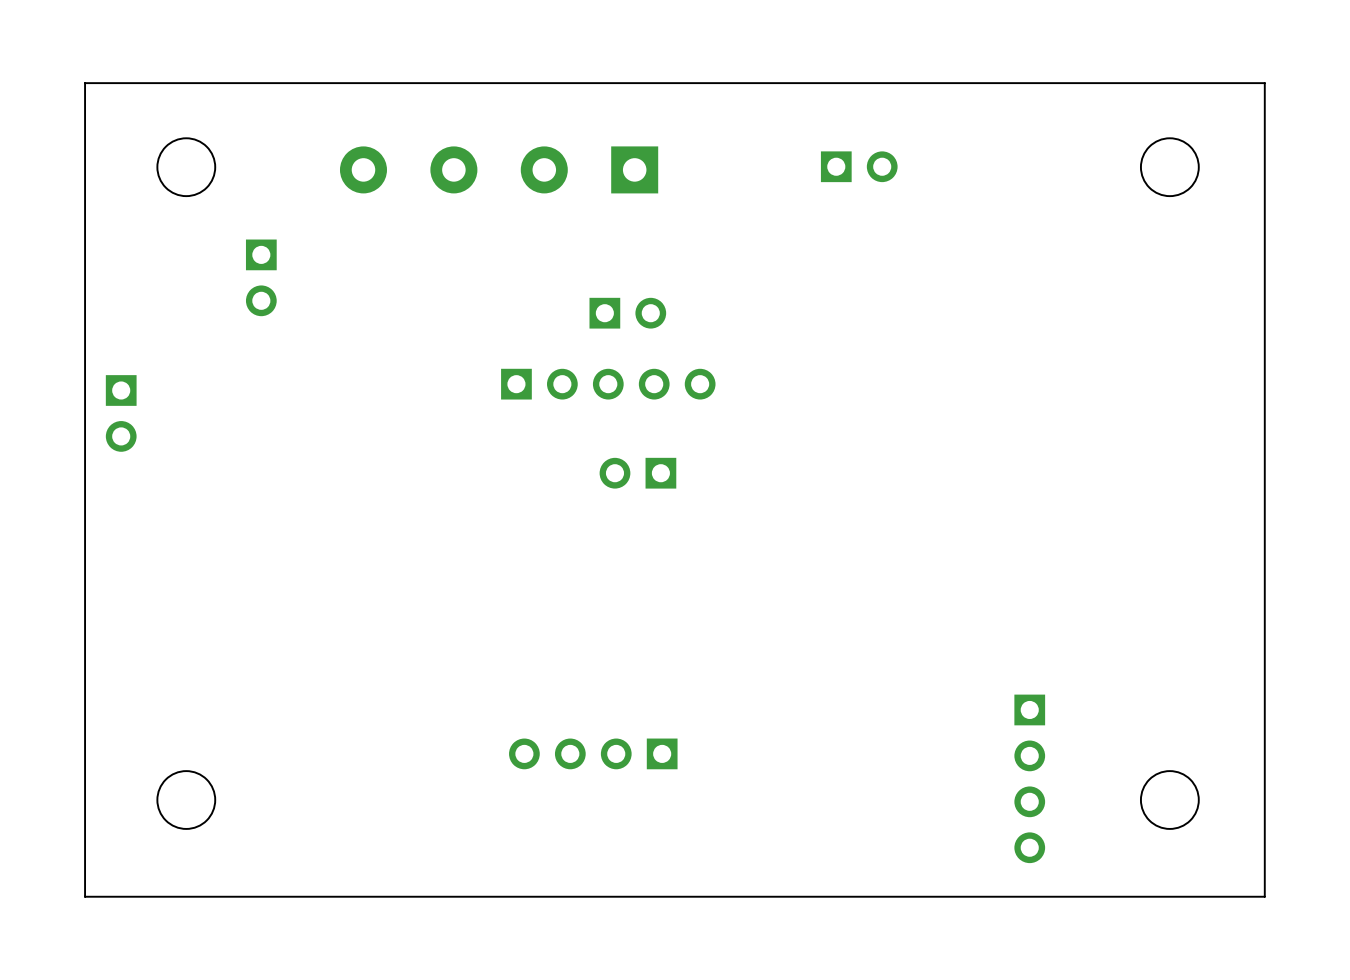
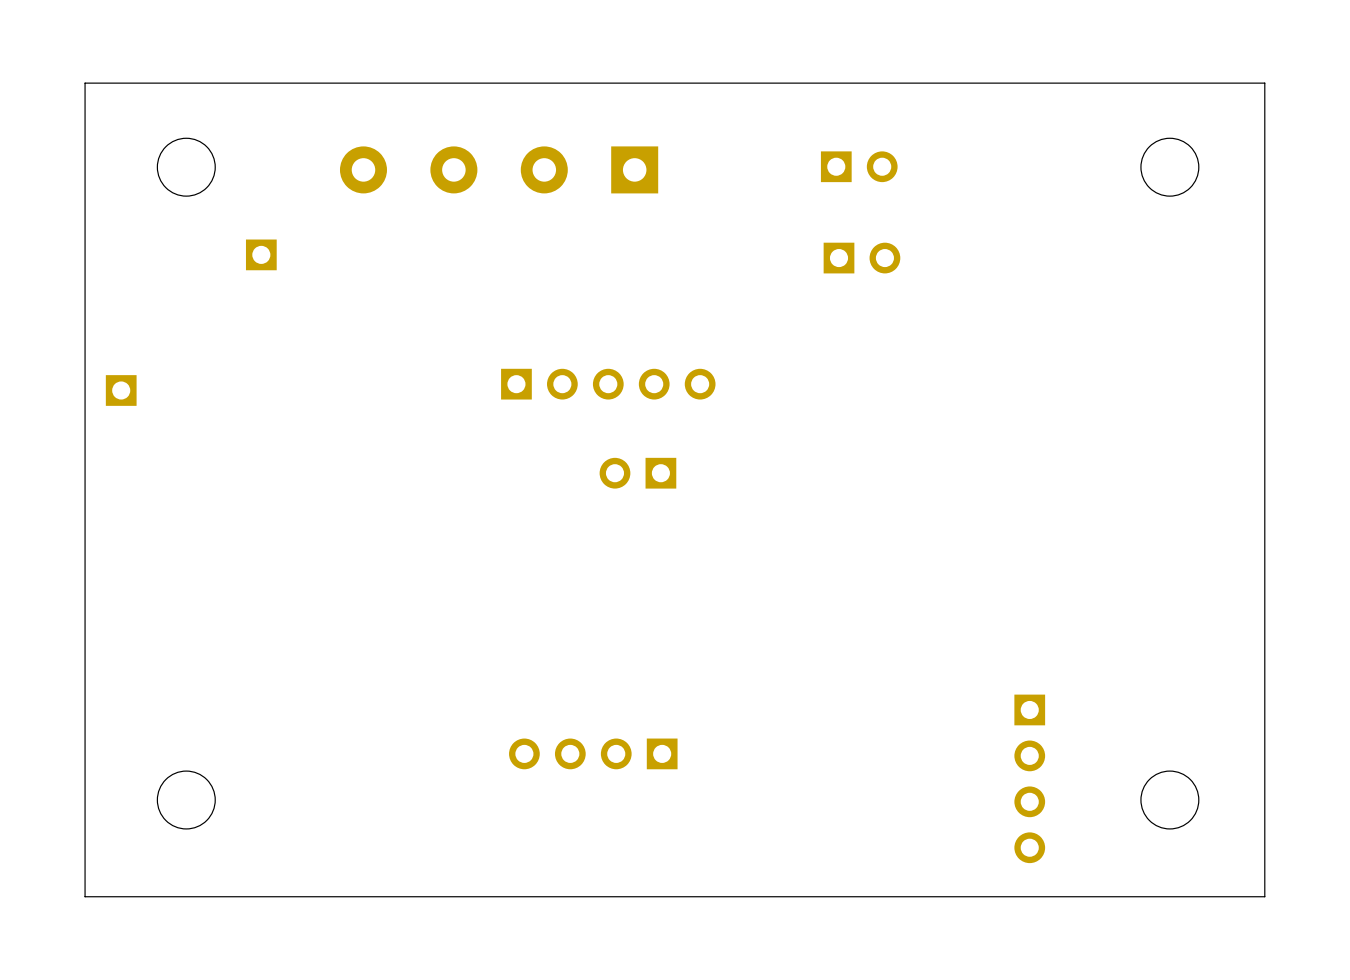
part: (261, 277) -> none
part position: (627, 313) -> (861, 258)
part: (121, 413) -> none

